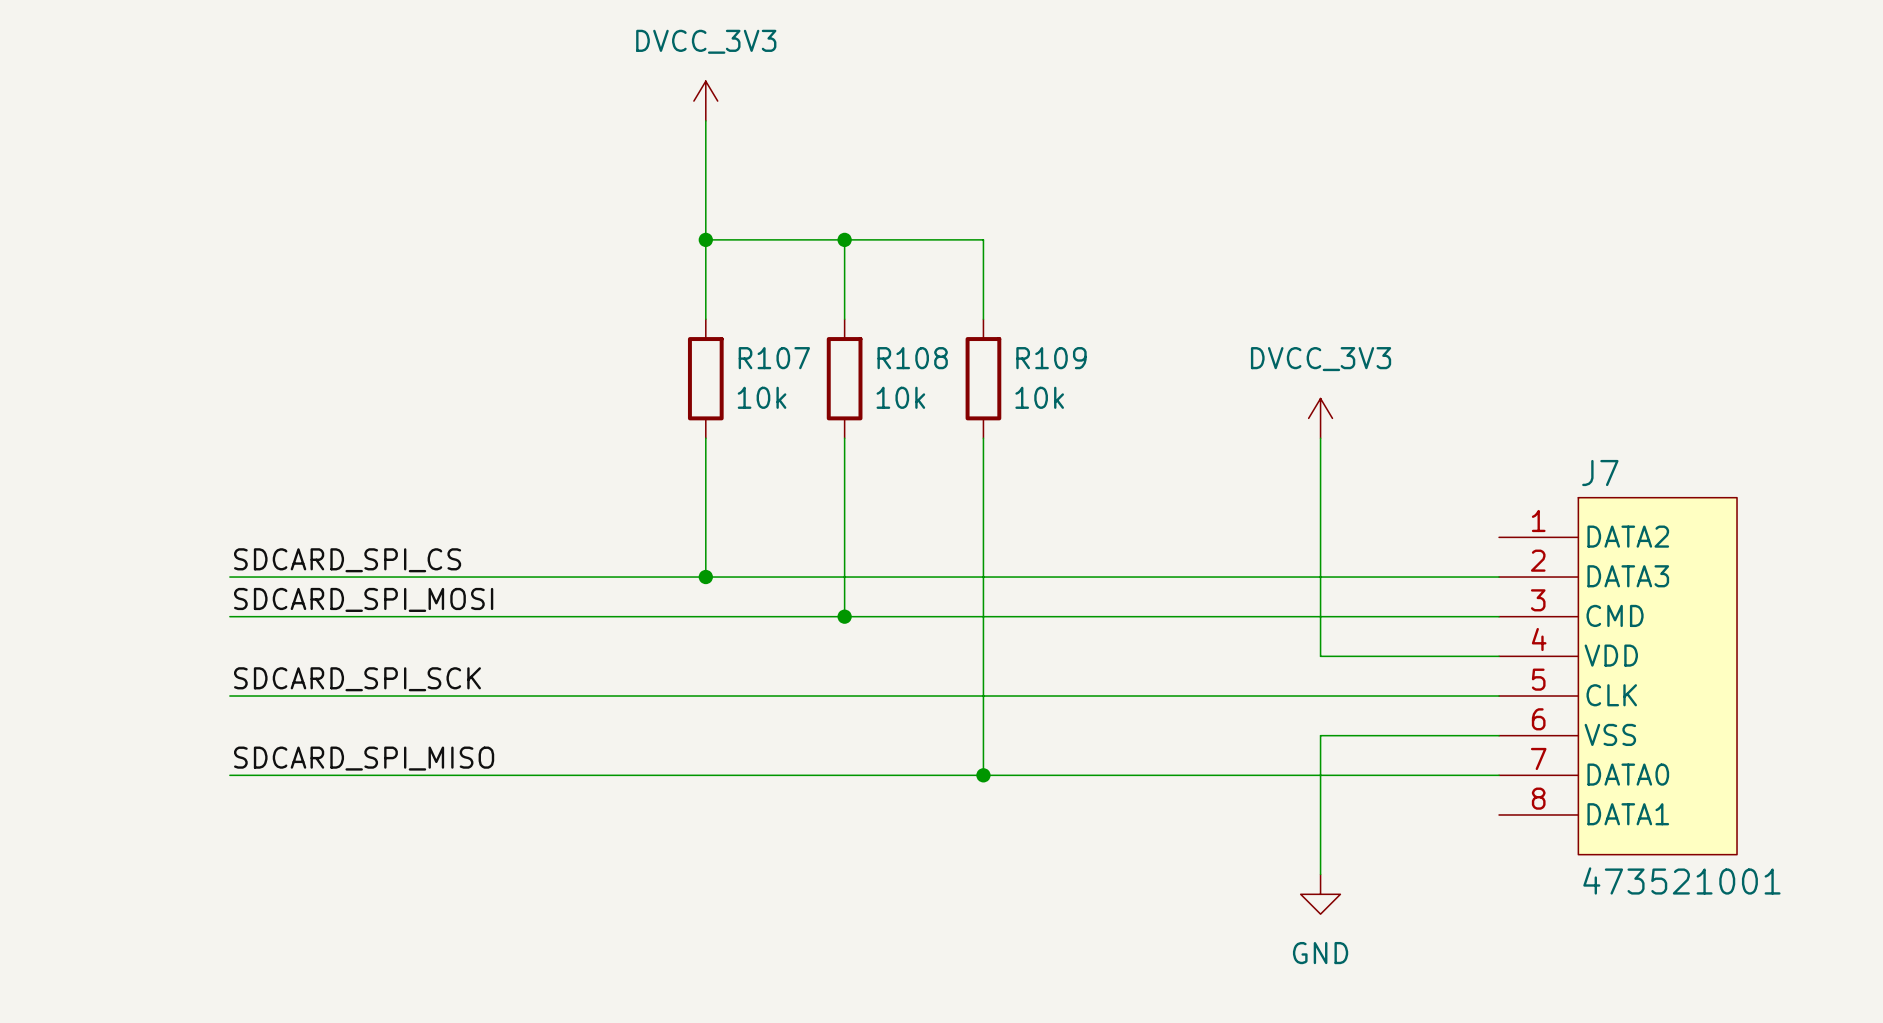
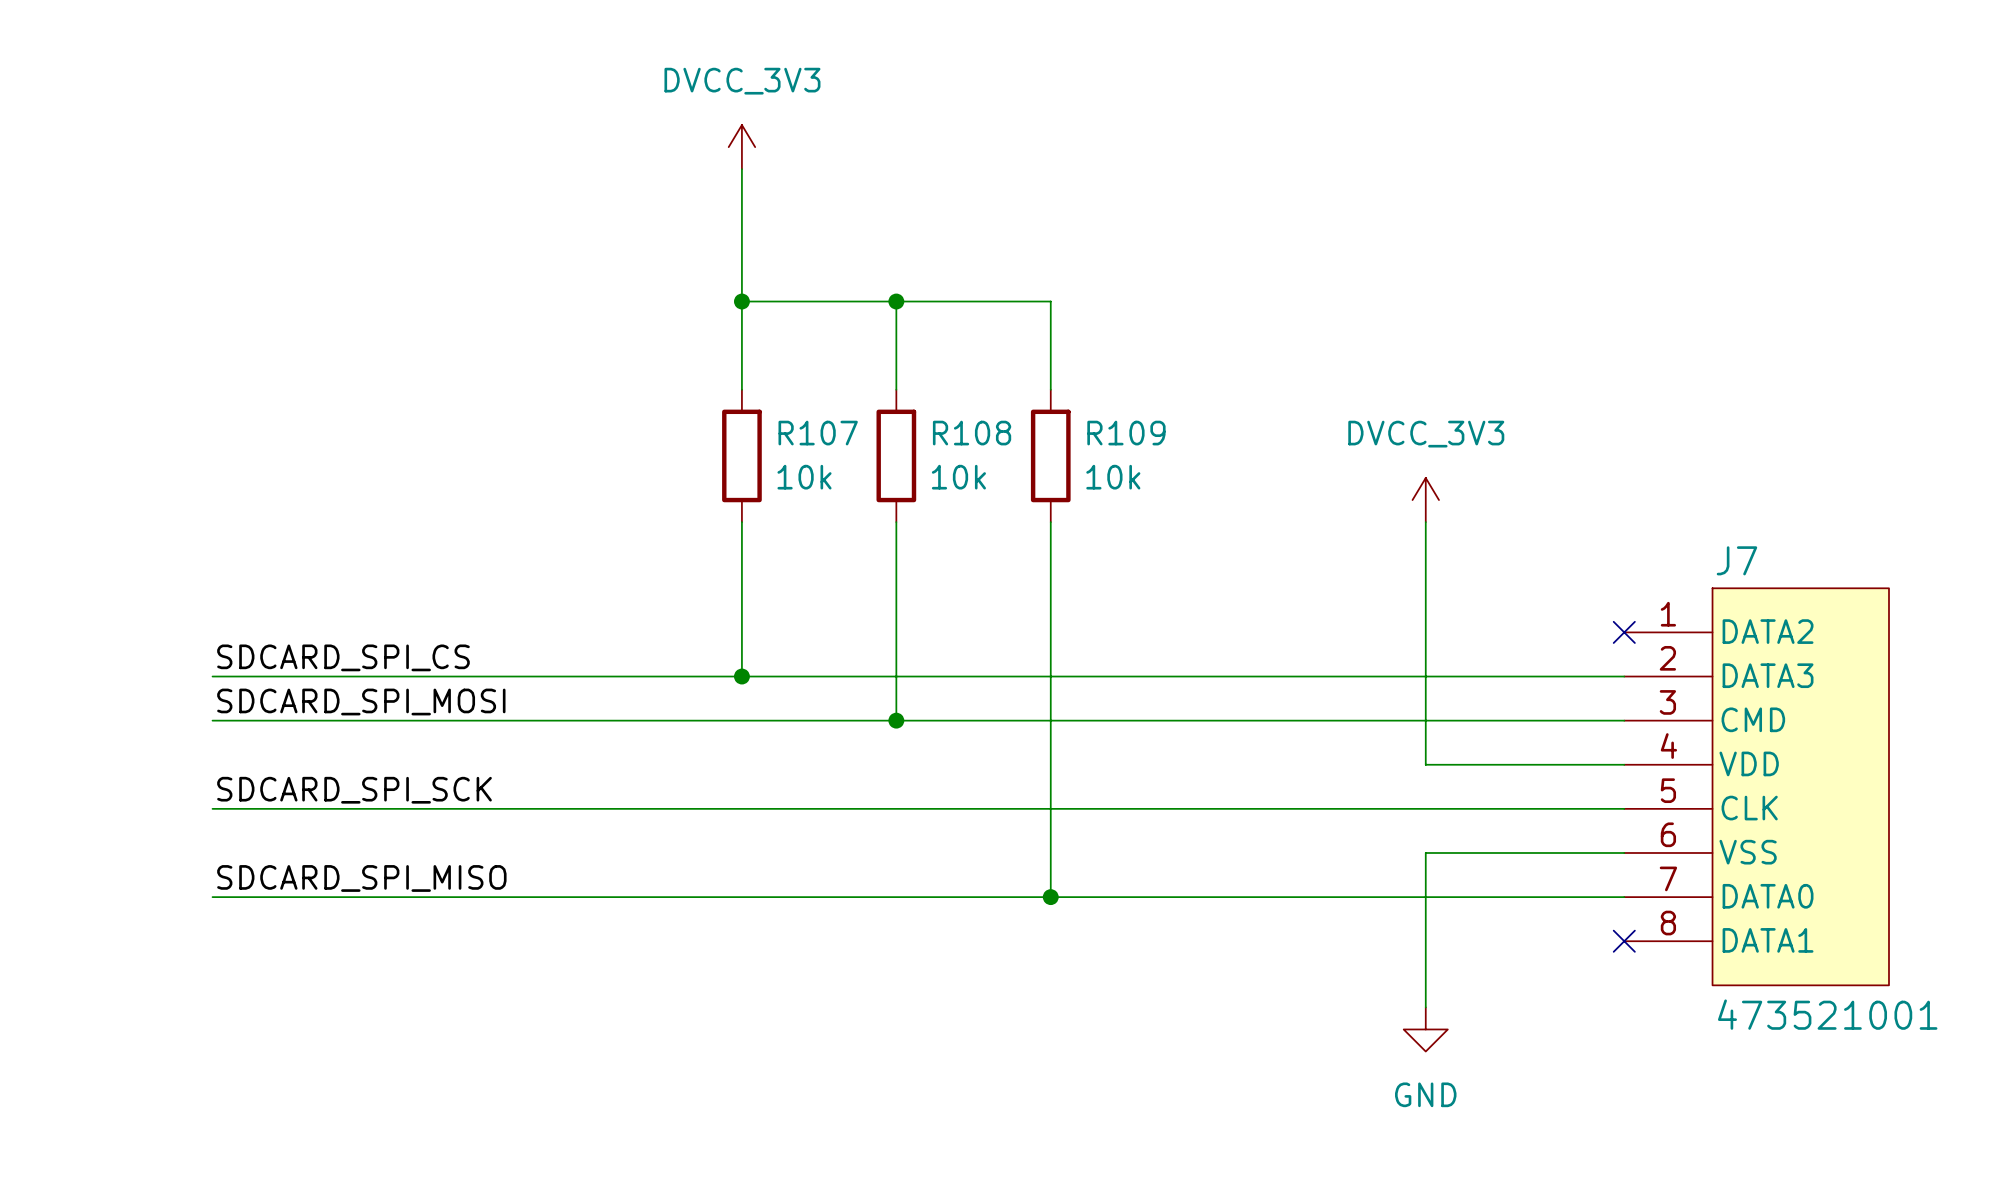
no-connect mark: none -> (1624, 632)
no-connect mark: none -> (1624, 941)

